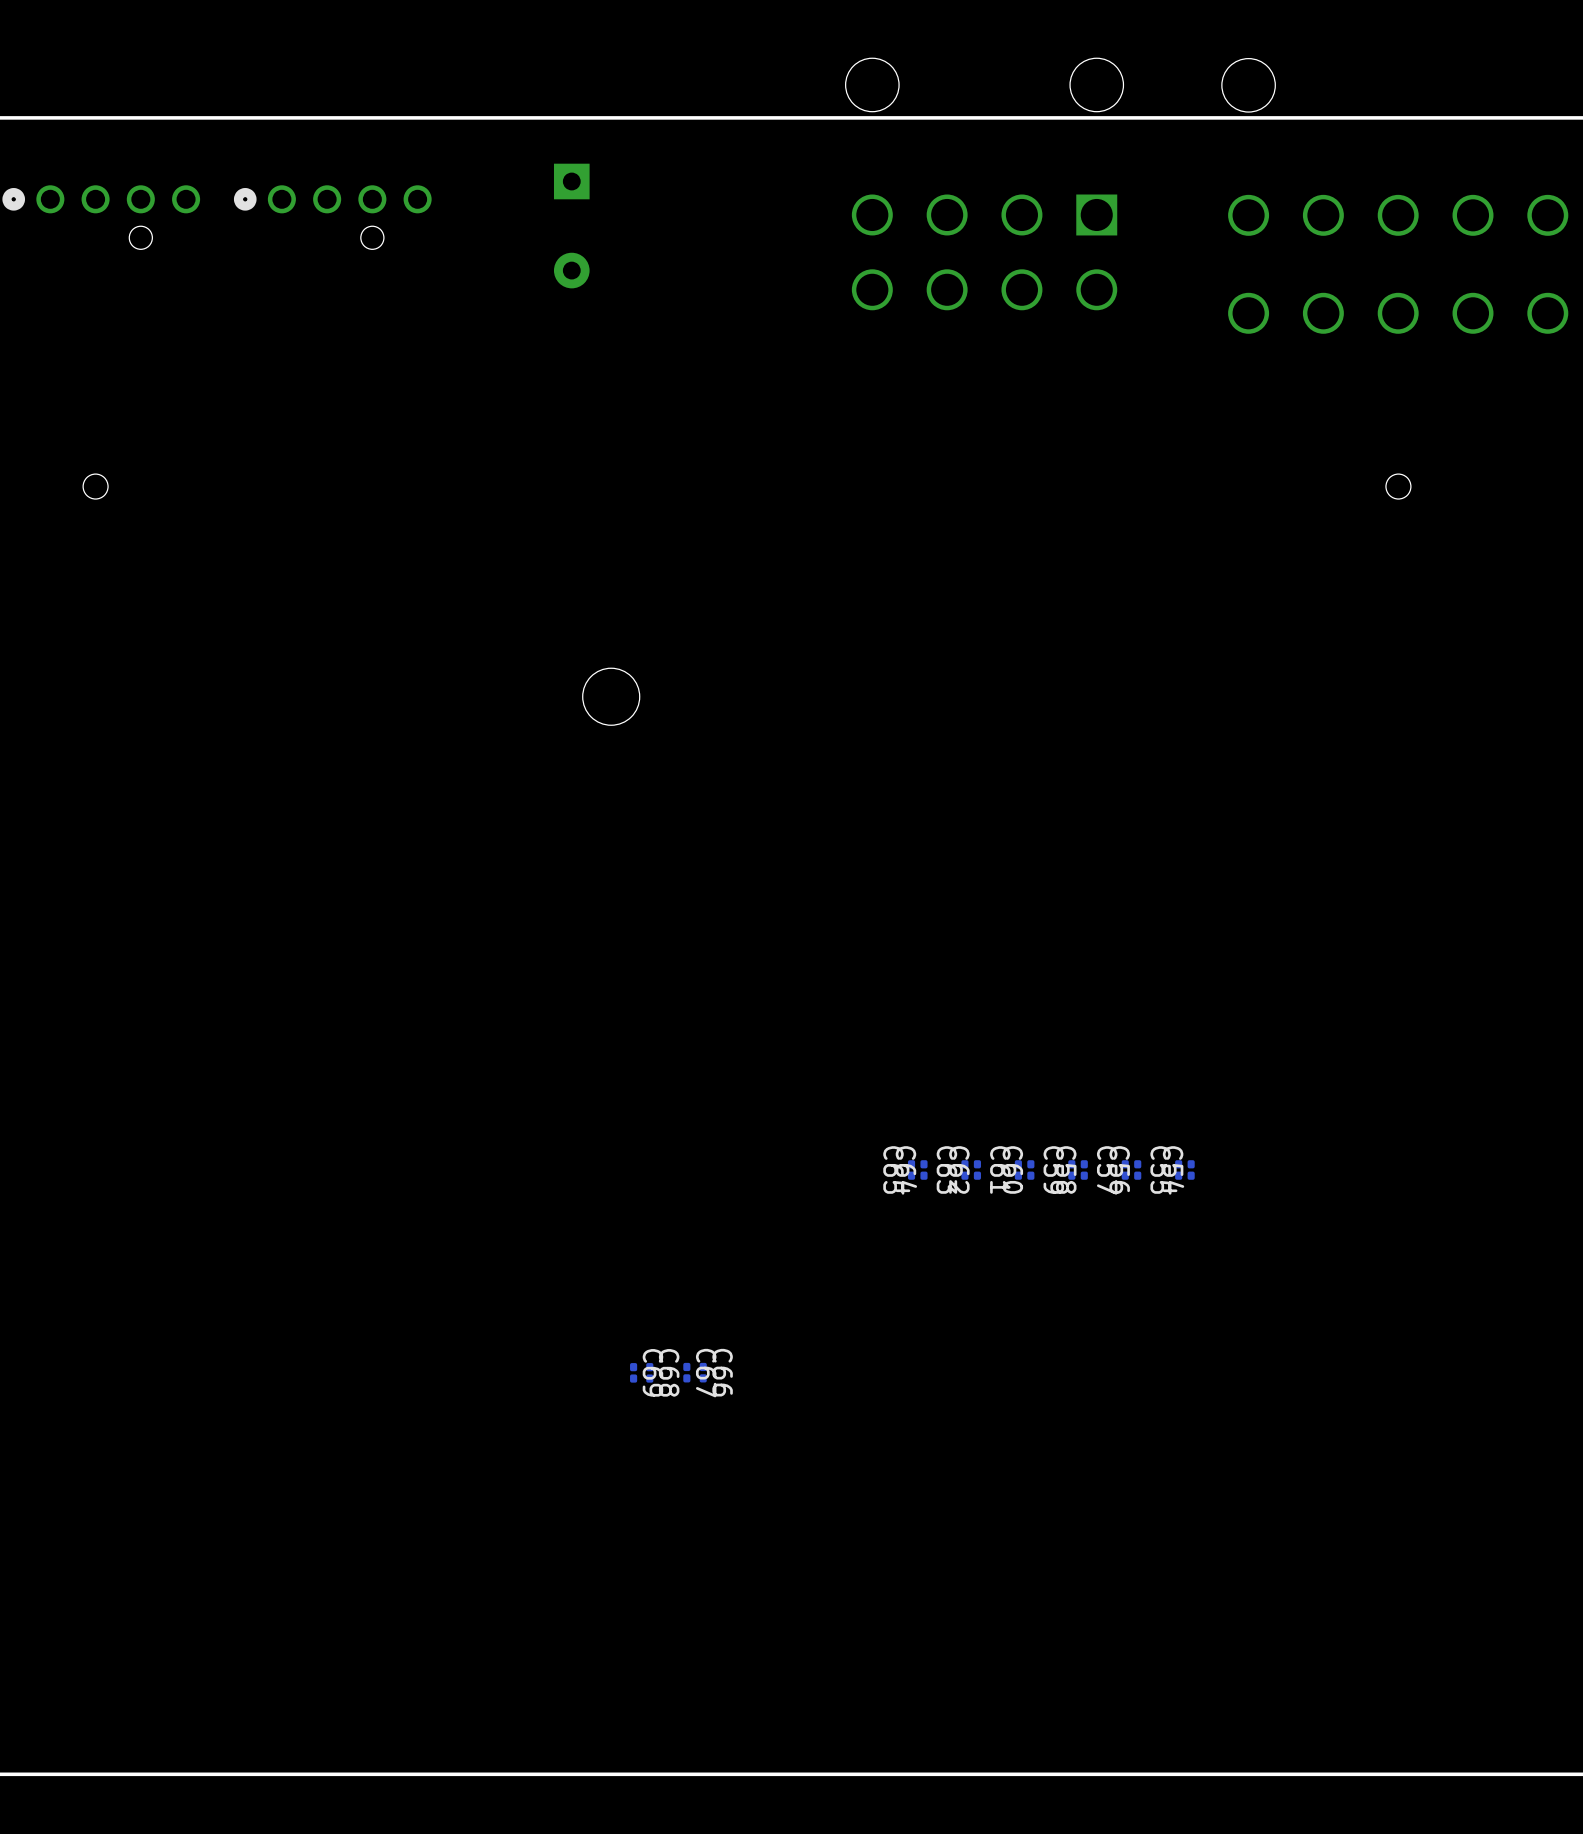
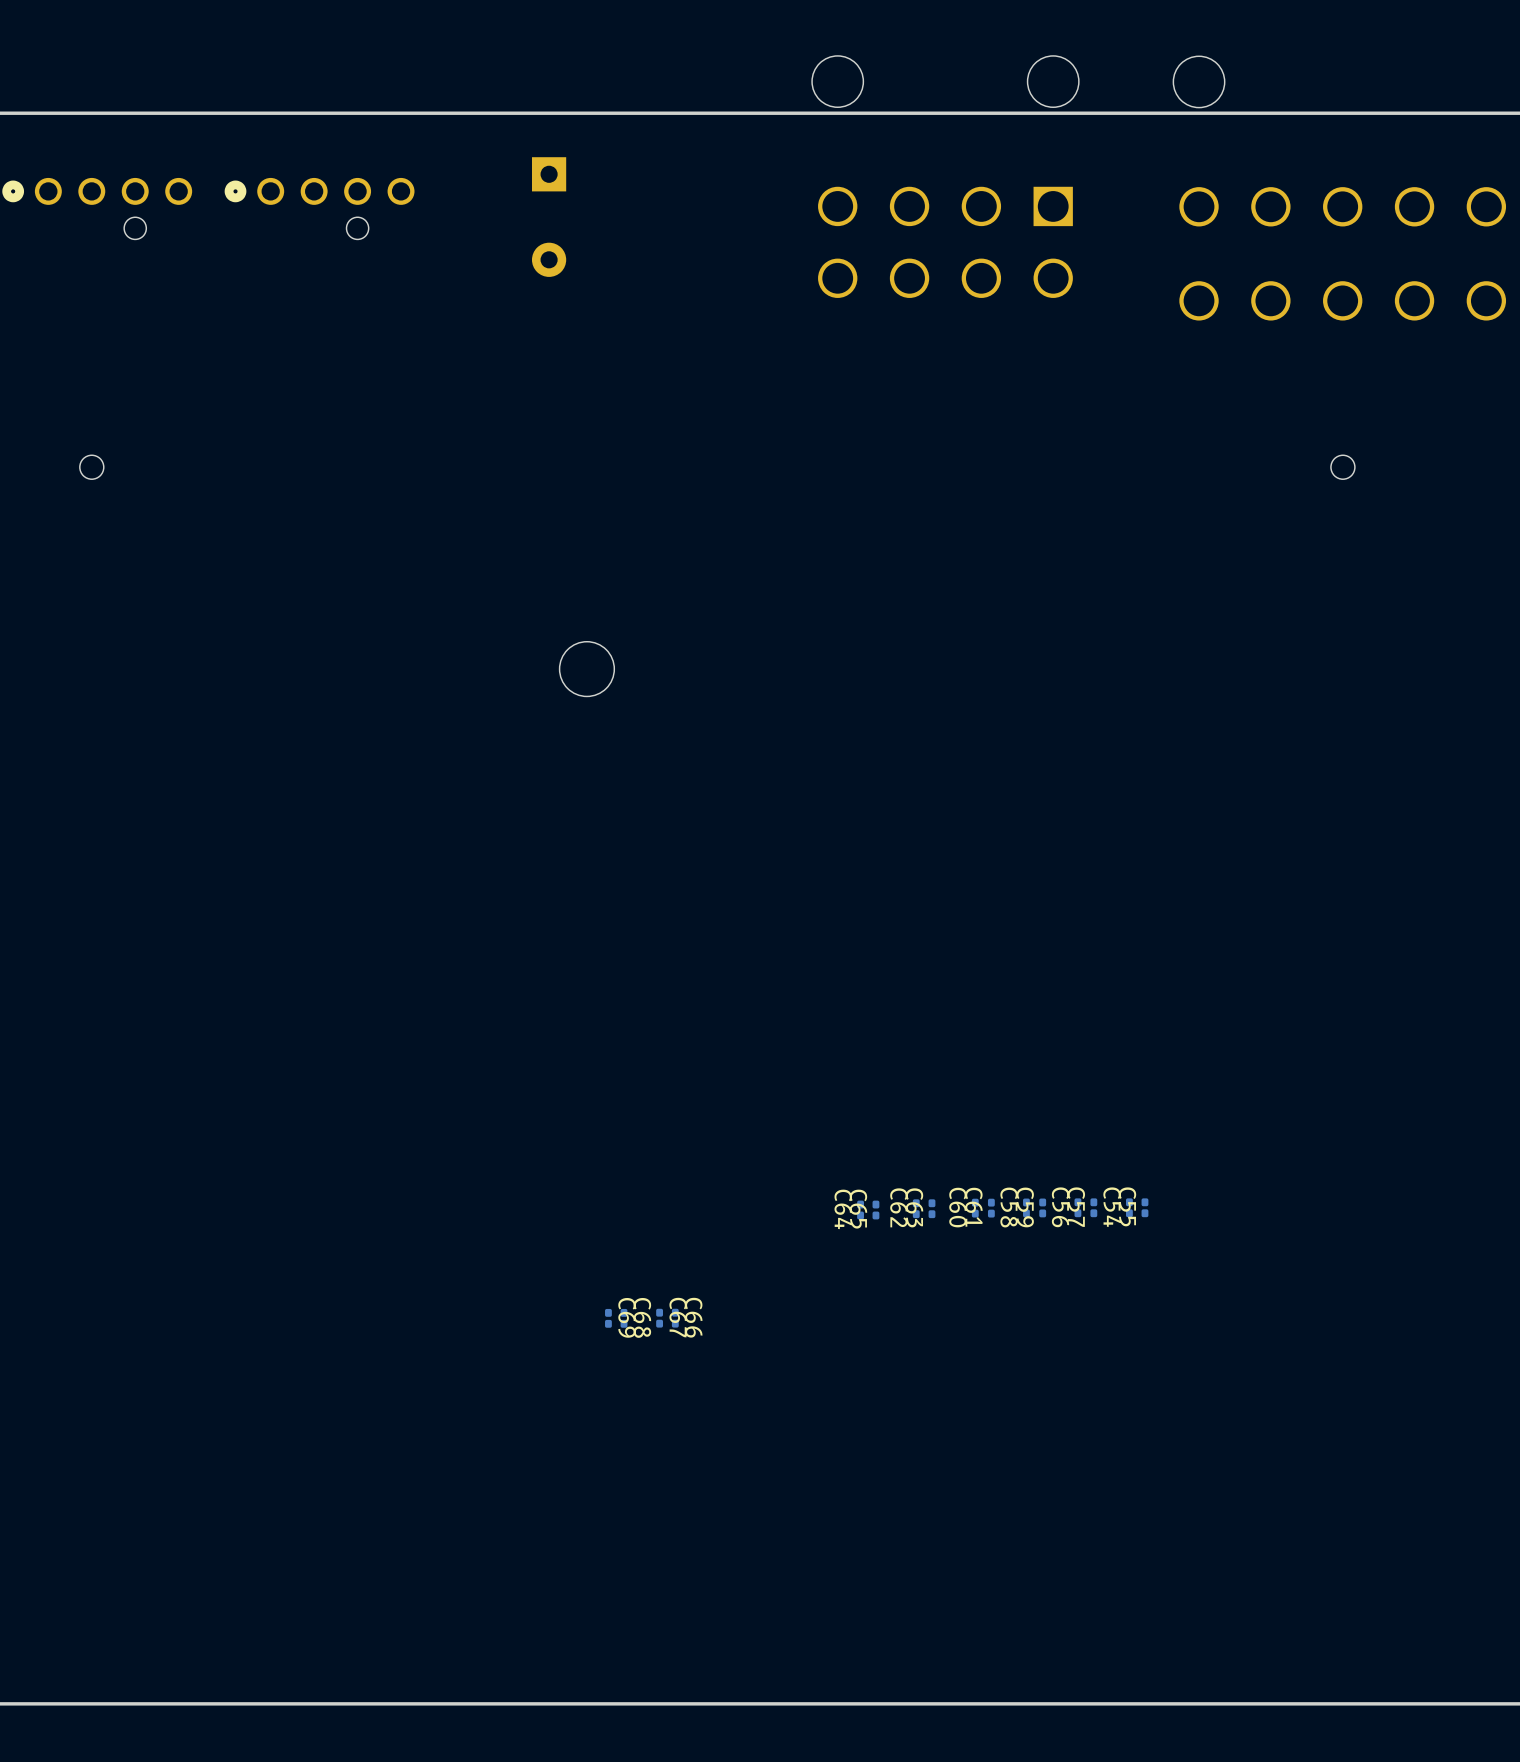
C65 position: (911, 1169) -> (875, 1210)
C64 position: (923, 1169) -> (860, 1210)
C63 position: (964, 1169) -> (931, 1208)
C62 position: (977, 1169) -> (916, 1208)
C61 position: (1018, 1169) -> (991, 1208)
C60 position: (1030, 1169) -> (975, 1208)
C59 position: (1071, 1169) -> (1042, 1207)
C58 position: (1084, 1169) -> (1026, 1207)
C57 position: (1125, 1169) -> (1093, 1207)
C56 position: (1137, 1169) -> (1077, 1207)
C55 position: (1178, 1169) -> (1144, 1207)
C54 position: (1191, 1169) -> (1129, 1207)

